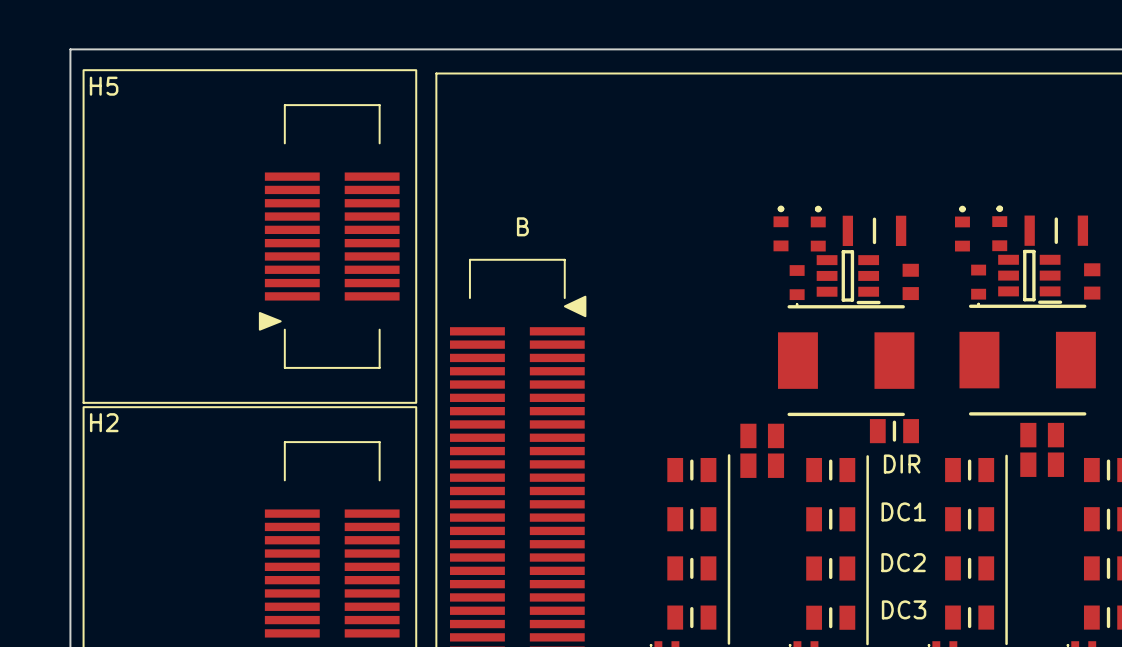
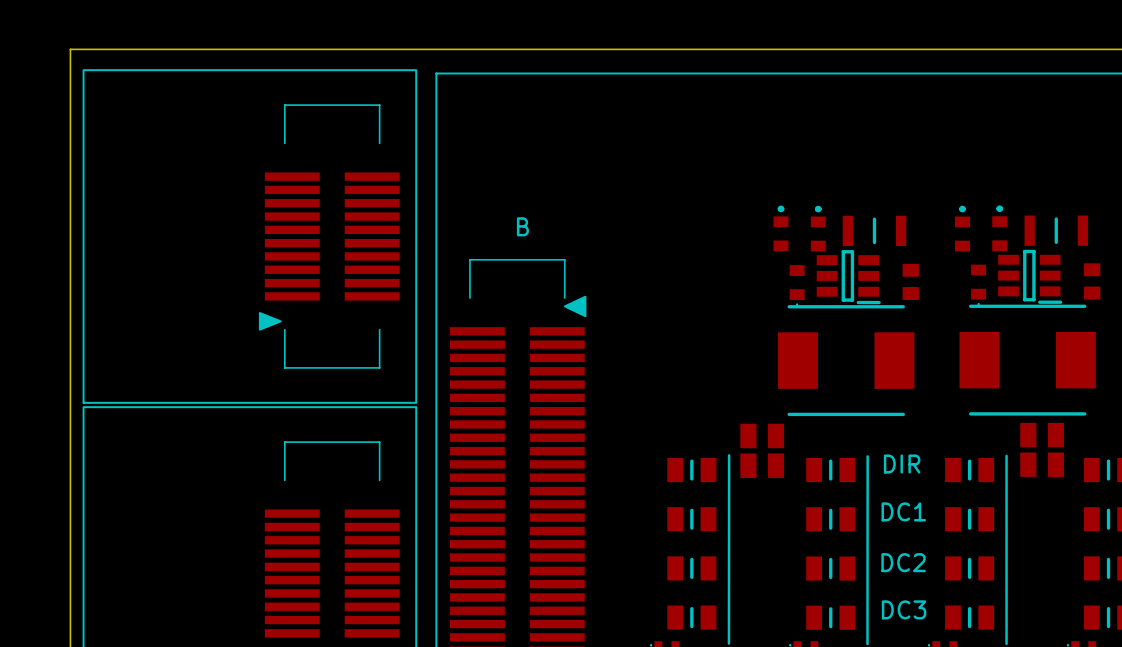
H5 name: H5 (104, 86) -> none
H2 name: H2 (104, 422) -> none
part: (894, 431) -> none

